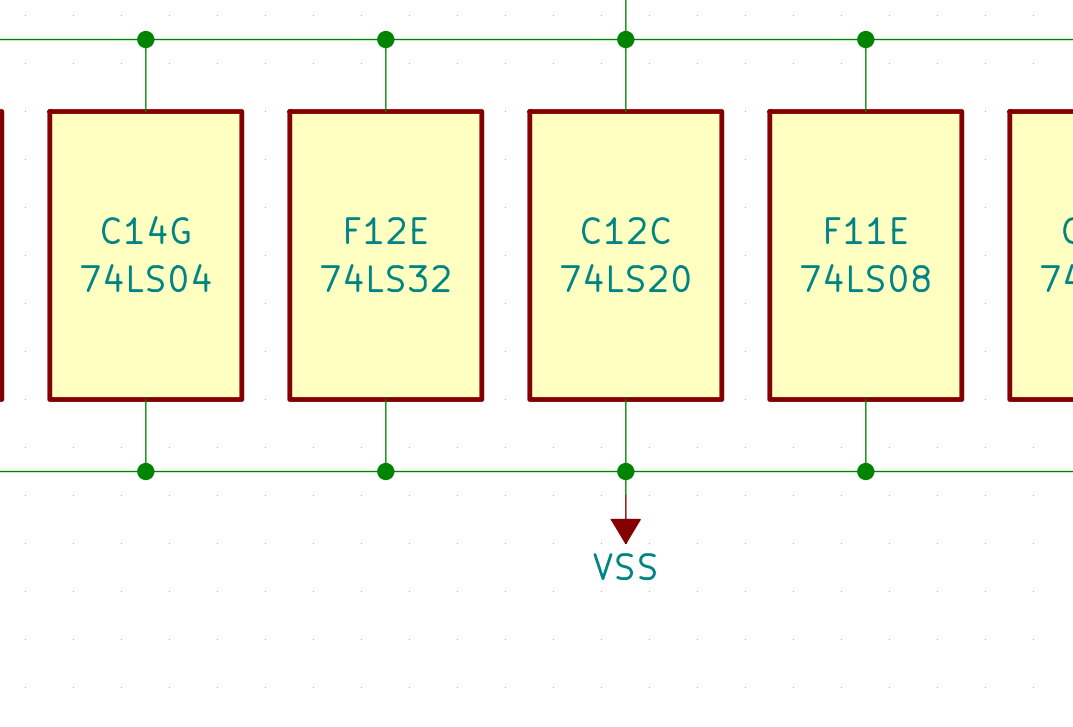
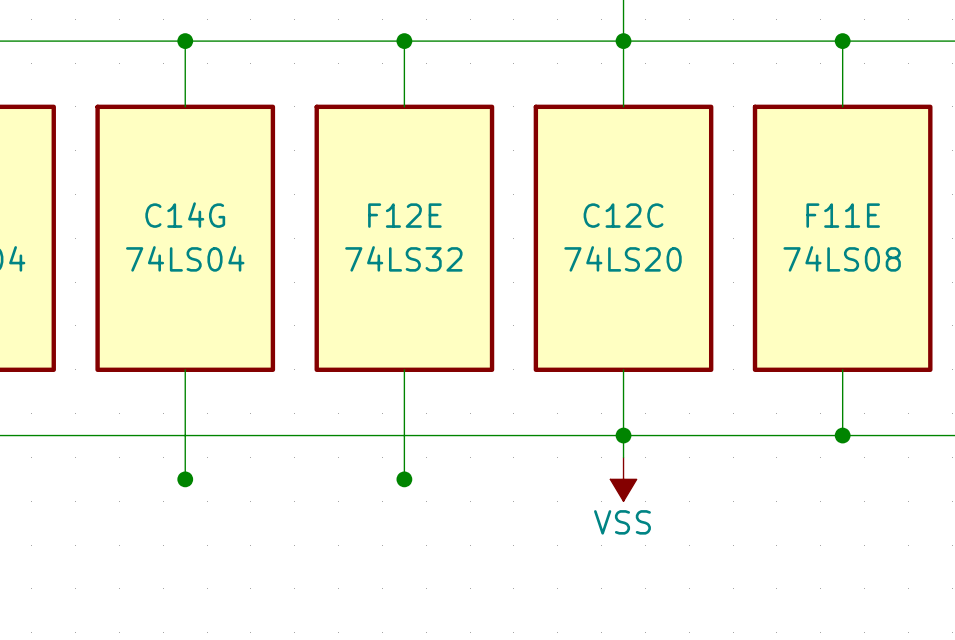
wire: none -> (185, 435) (185, 479)
junction position: (145, 471) -> (185, 479)
wire: none -> (404, 435) (404, 479)
junction position: (385, 471) -> (404, 479)

